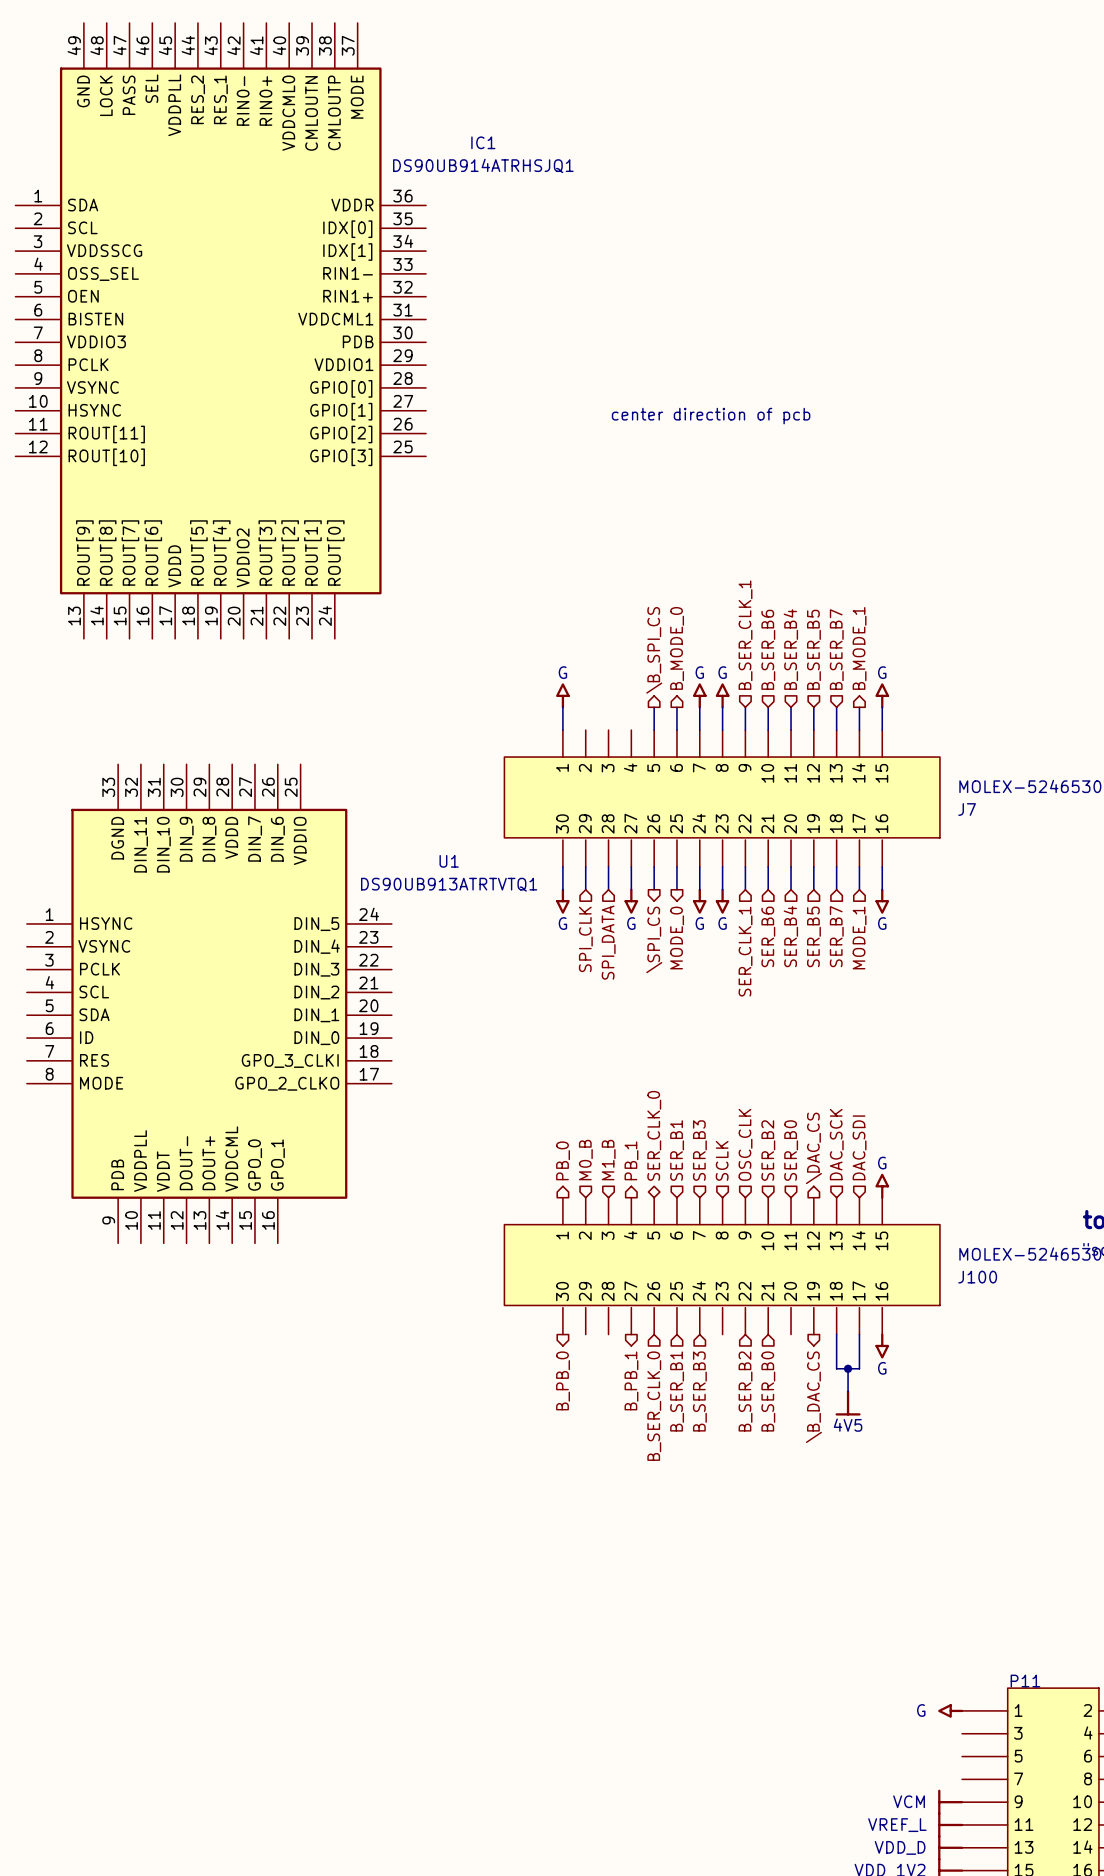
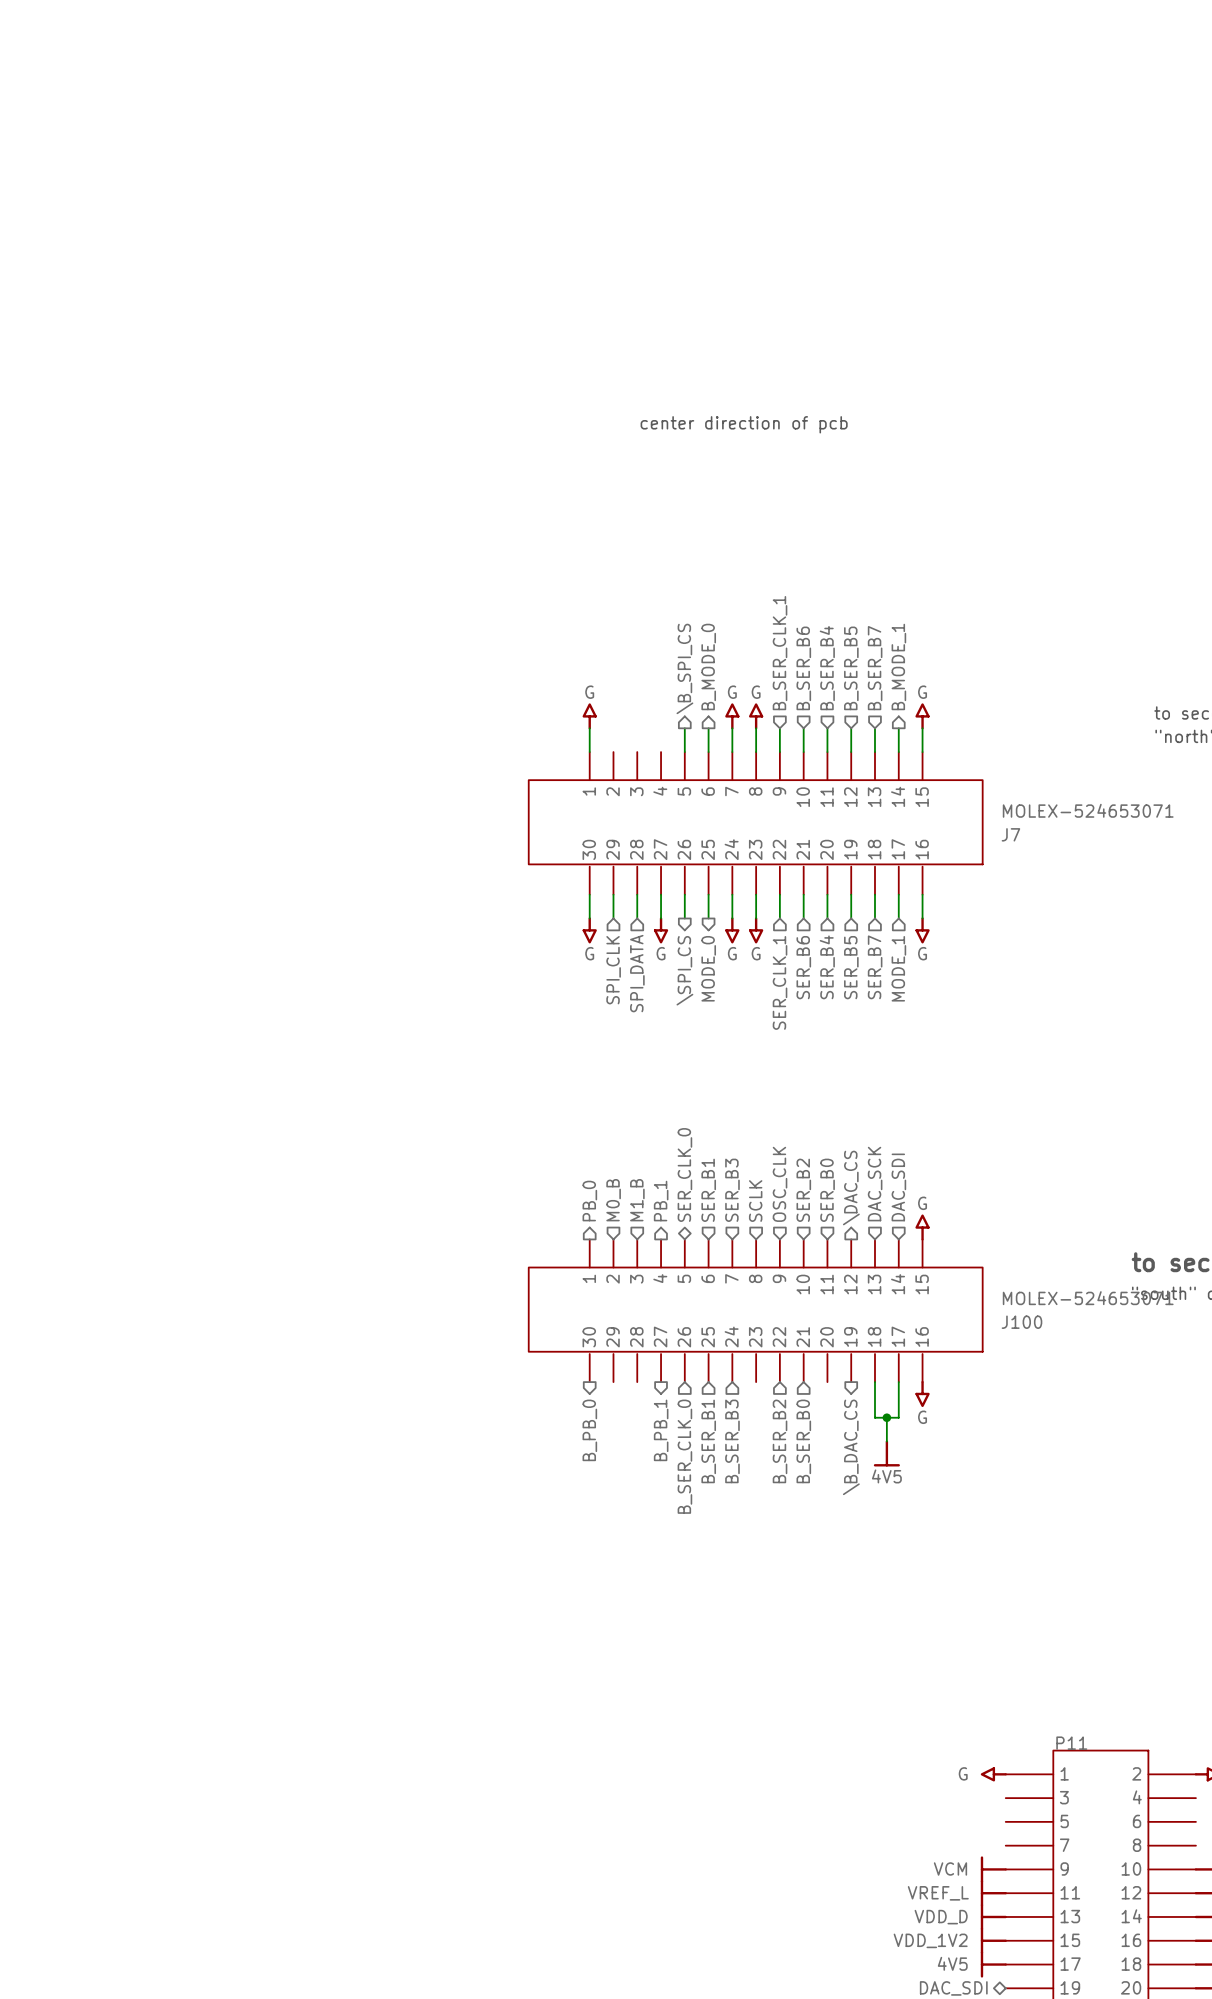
IC1: DS90UB914ATRHSJQ1 (220, 330) -> none
U1: DS90UB913ATRTVTQ1 (209, 1003) -> none

